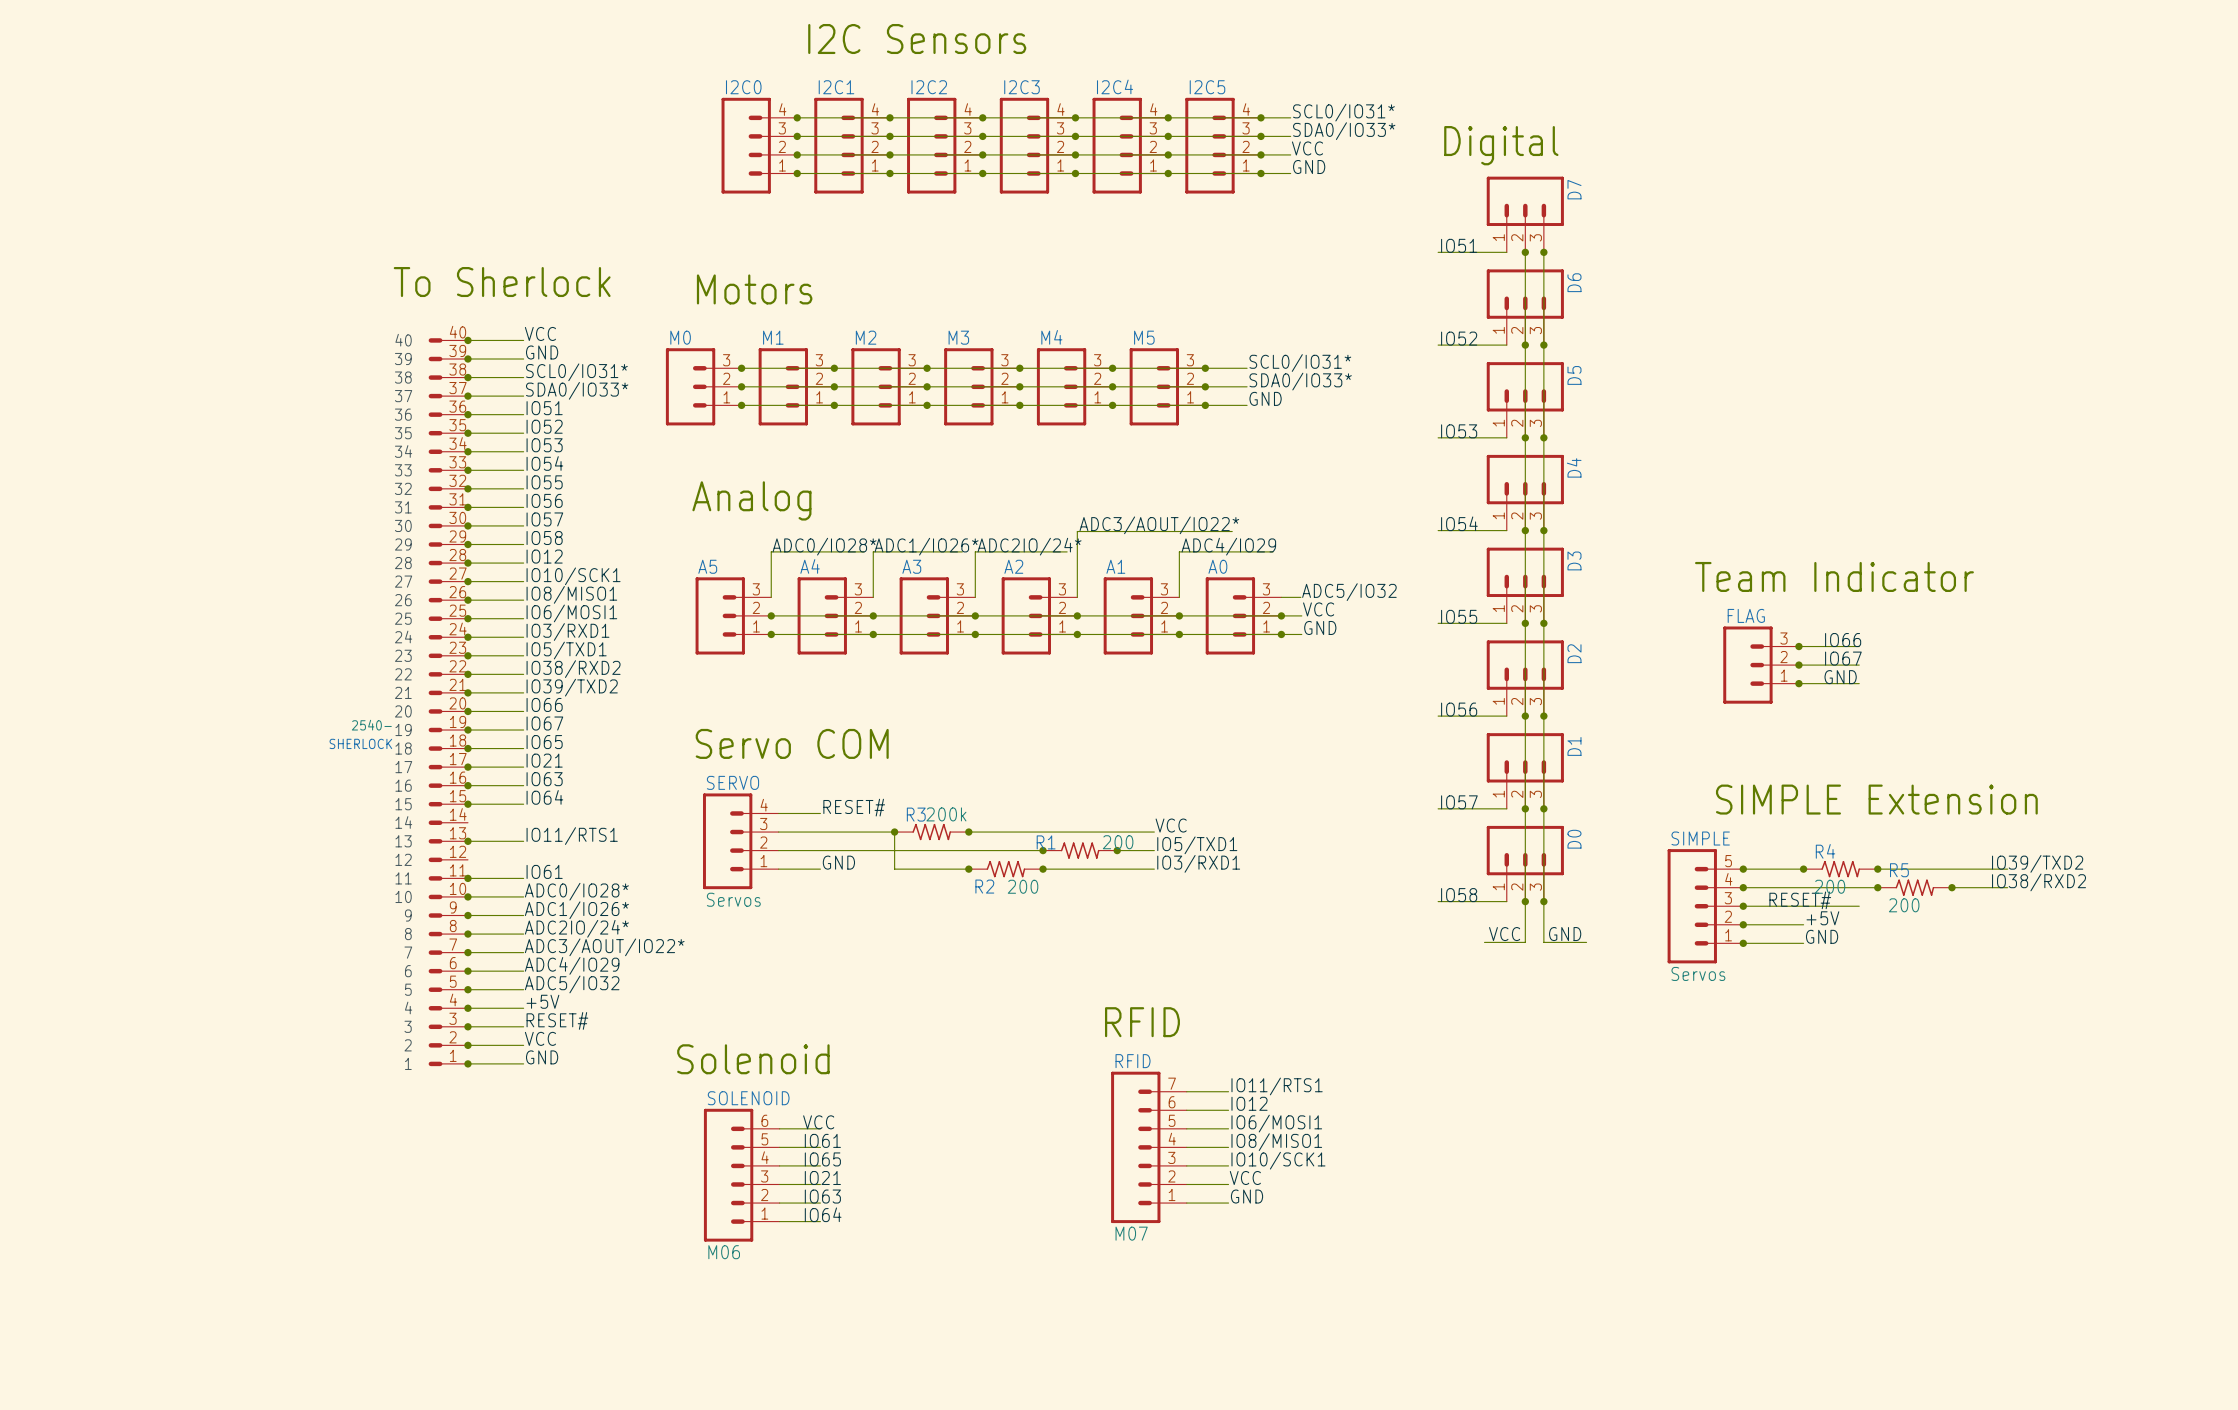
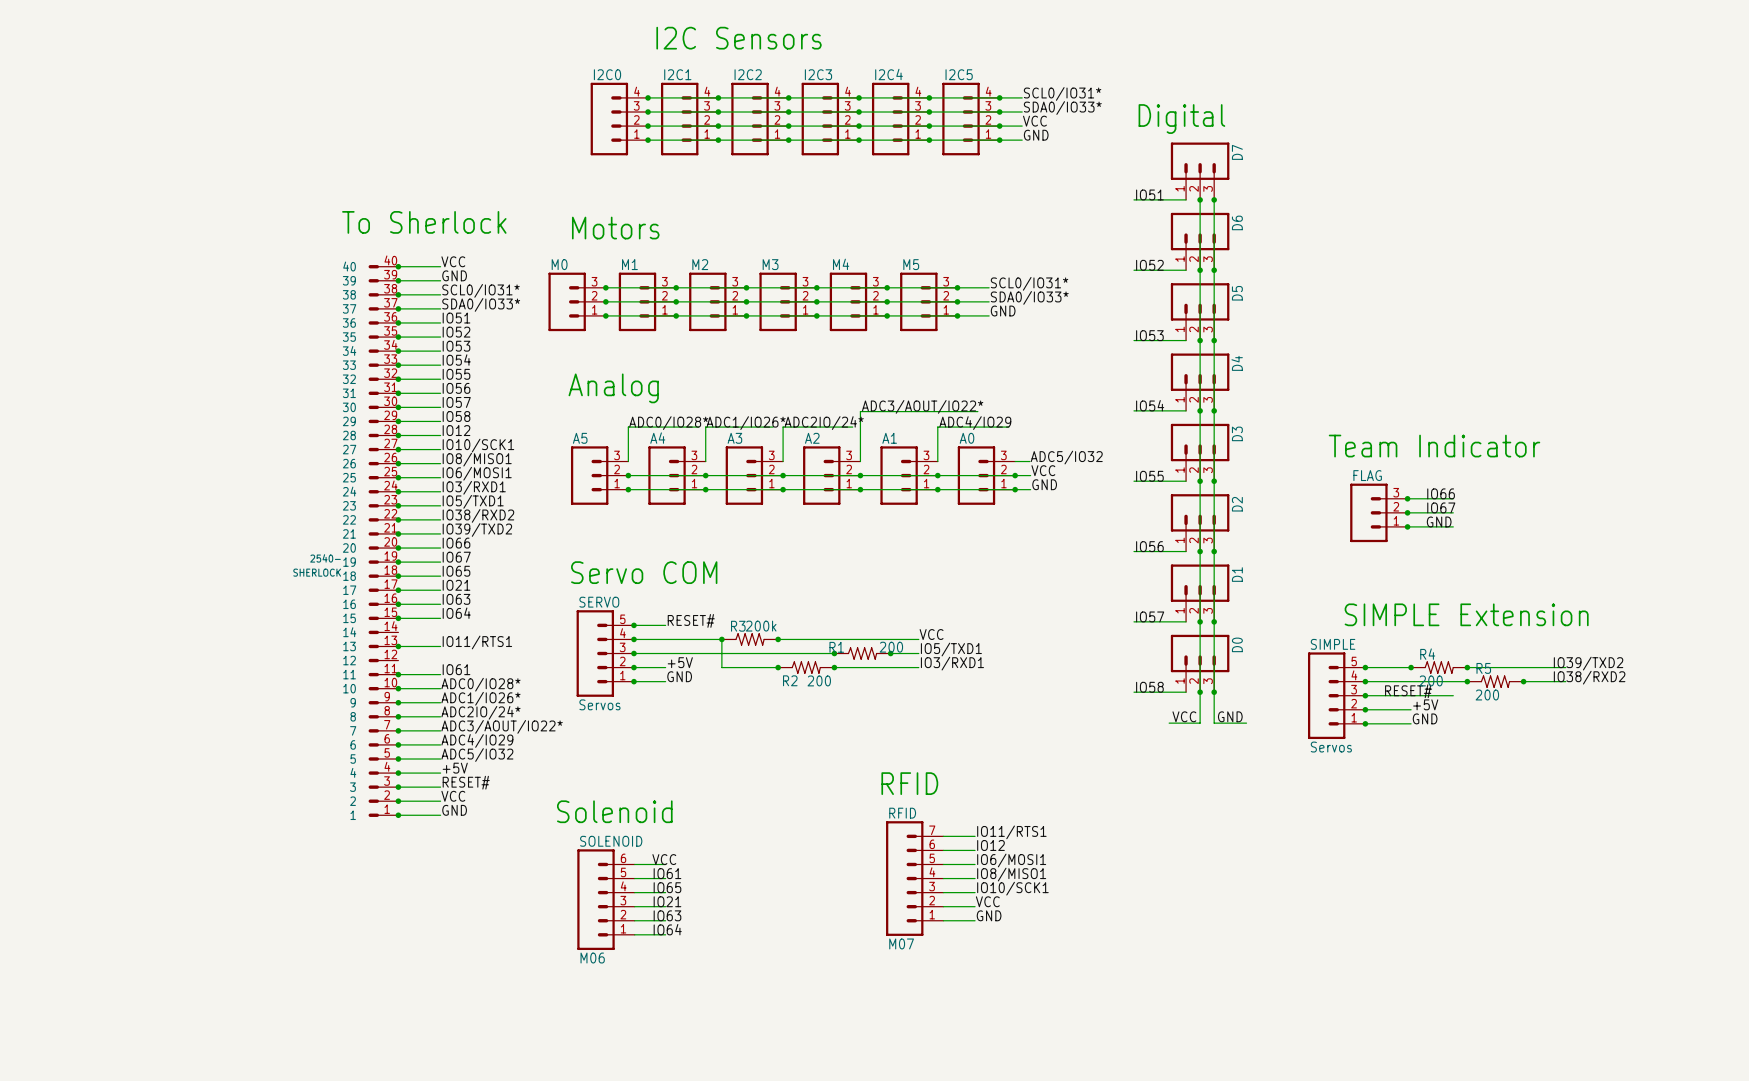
junction: none -> (633, 625)
junction: none -> (633, 639)
SERVO: Servos (740, 841) -> none
SERVO: none -> Servos (605, 653)
junction: none -> (633, 653)
label: GND (838, 862) -> +5V (680, 662)
junction: none -> (633, 667)
label: none -> GND (679, 676)
wire: none -> (633, 681) (665, 681)
junction: none -> (633, 681)

